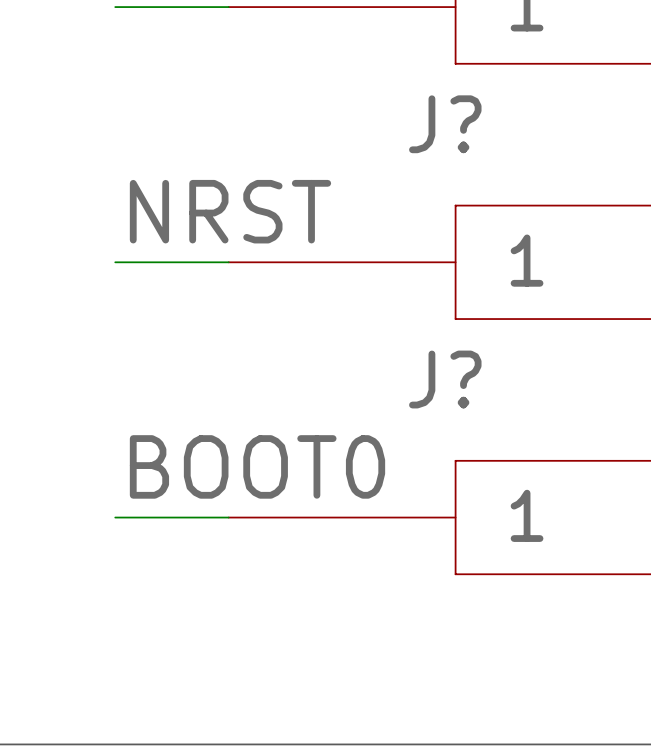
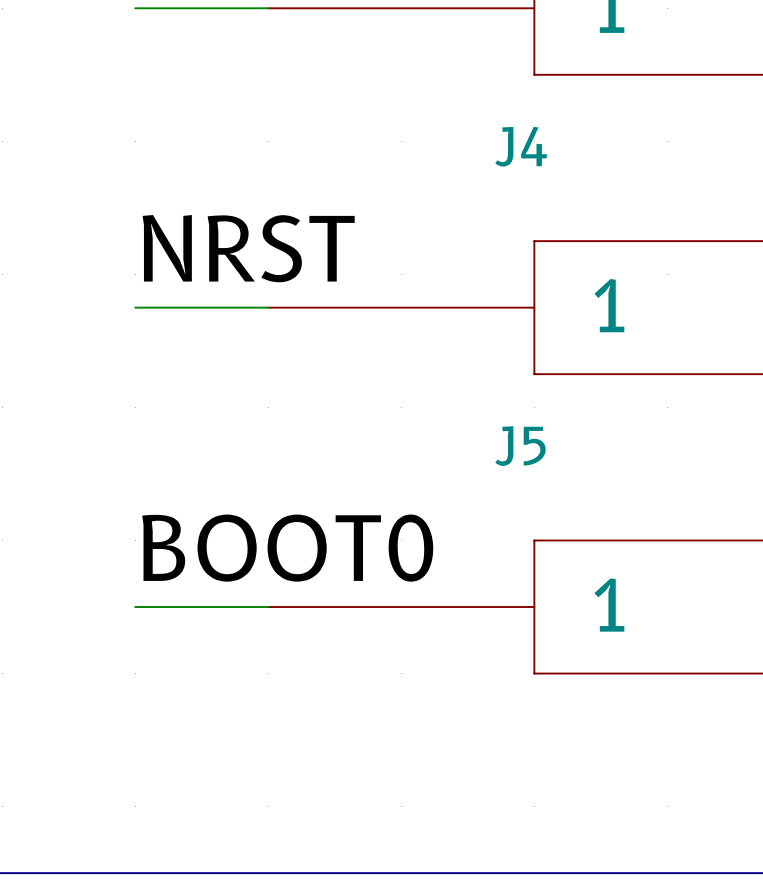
J? name: J? (445, 124) -> J4 (521, 146)
J? name: J? (445, 379) -> J5 (520, 446)

